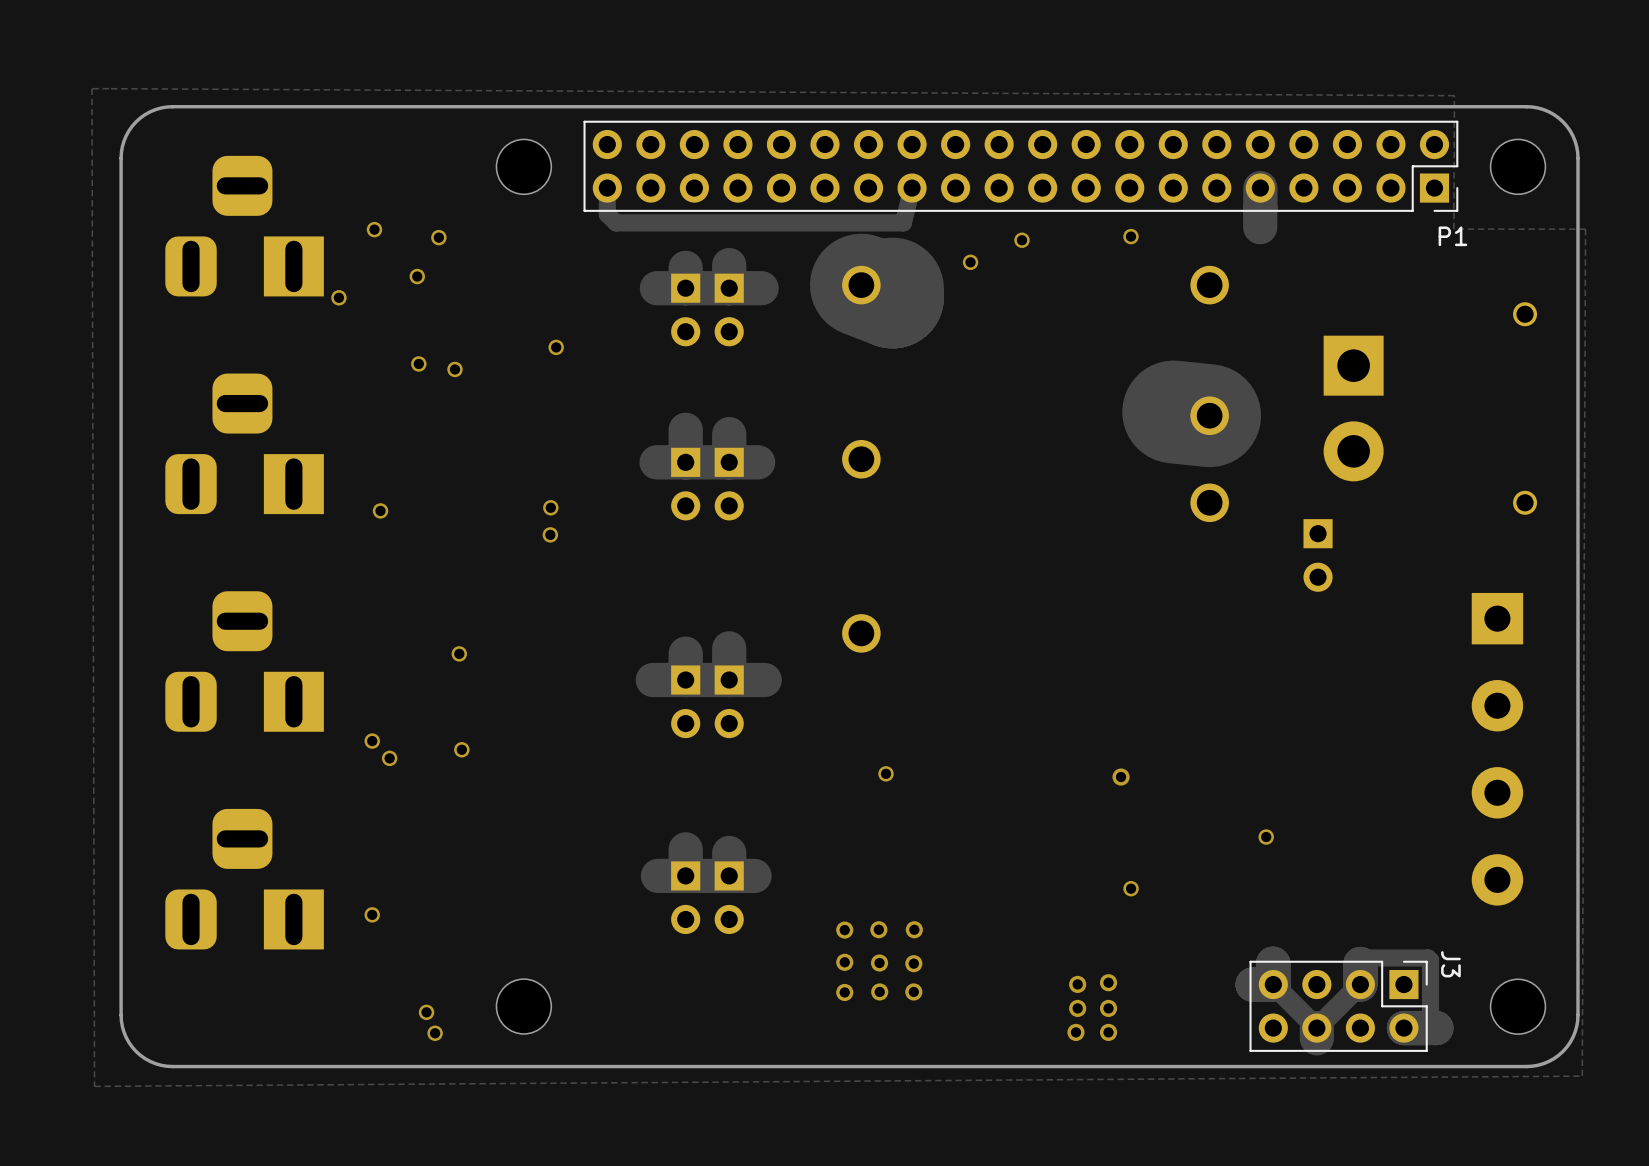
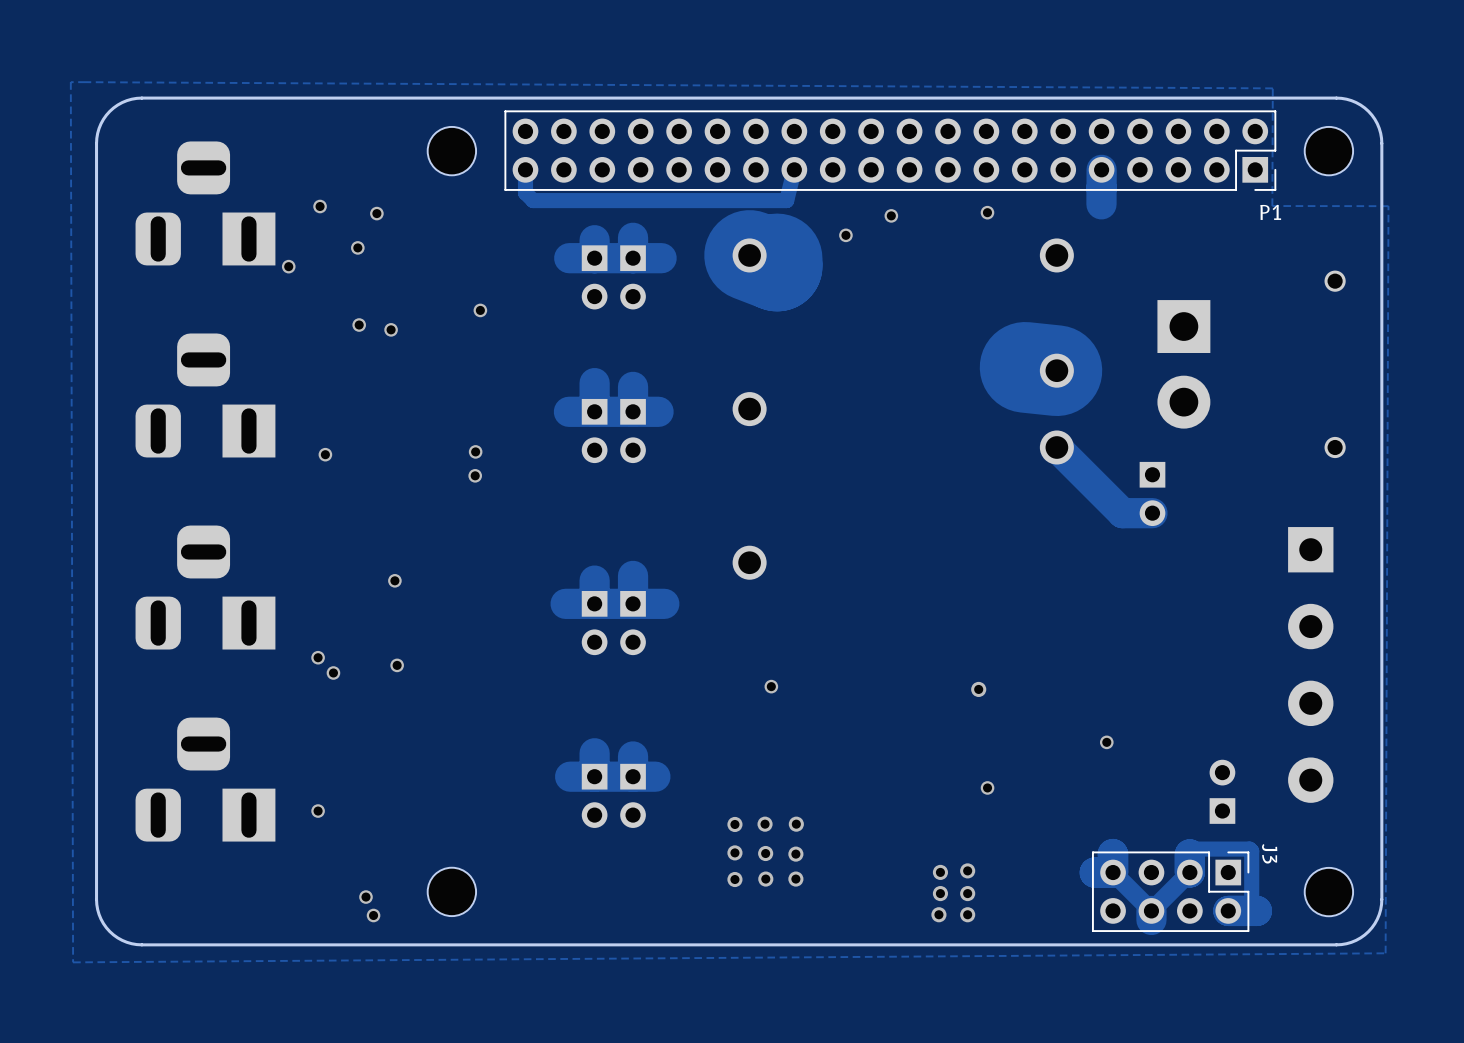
track: none -> (1056, 447) (1122, 513) (1152, 513)
part: none -> (1222, 791)

